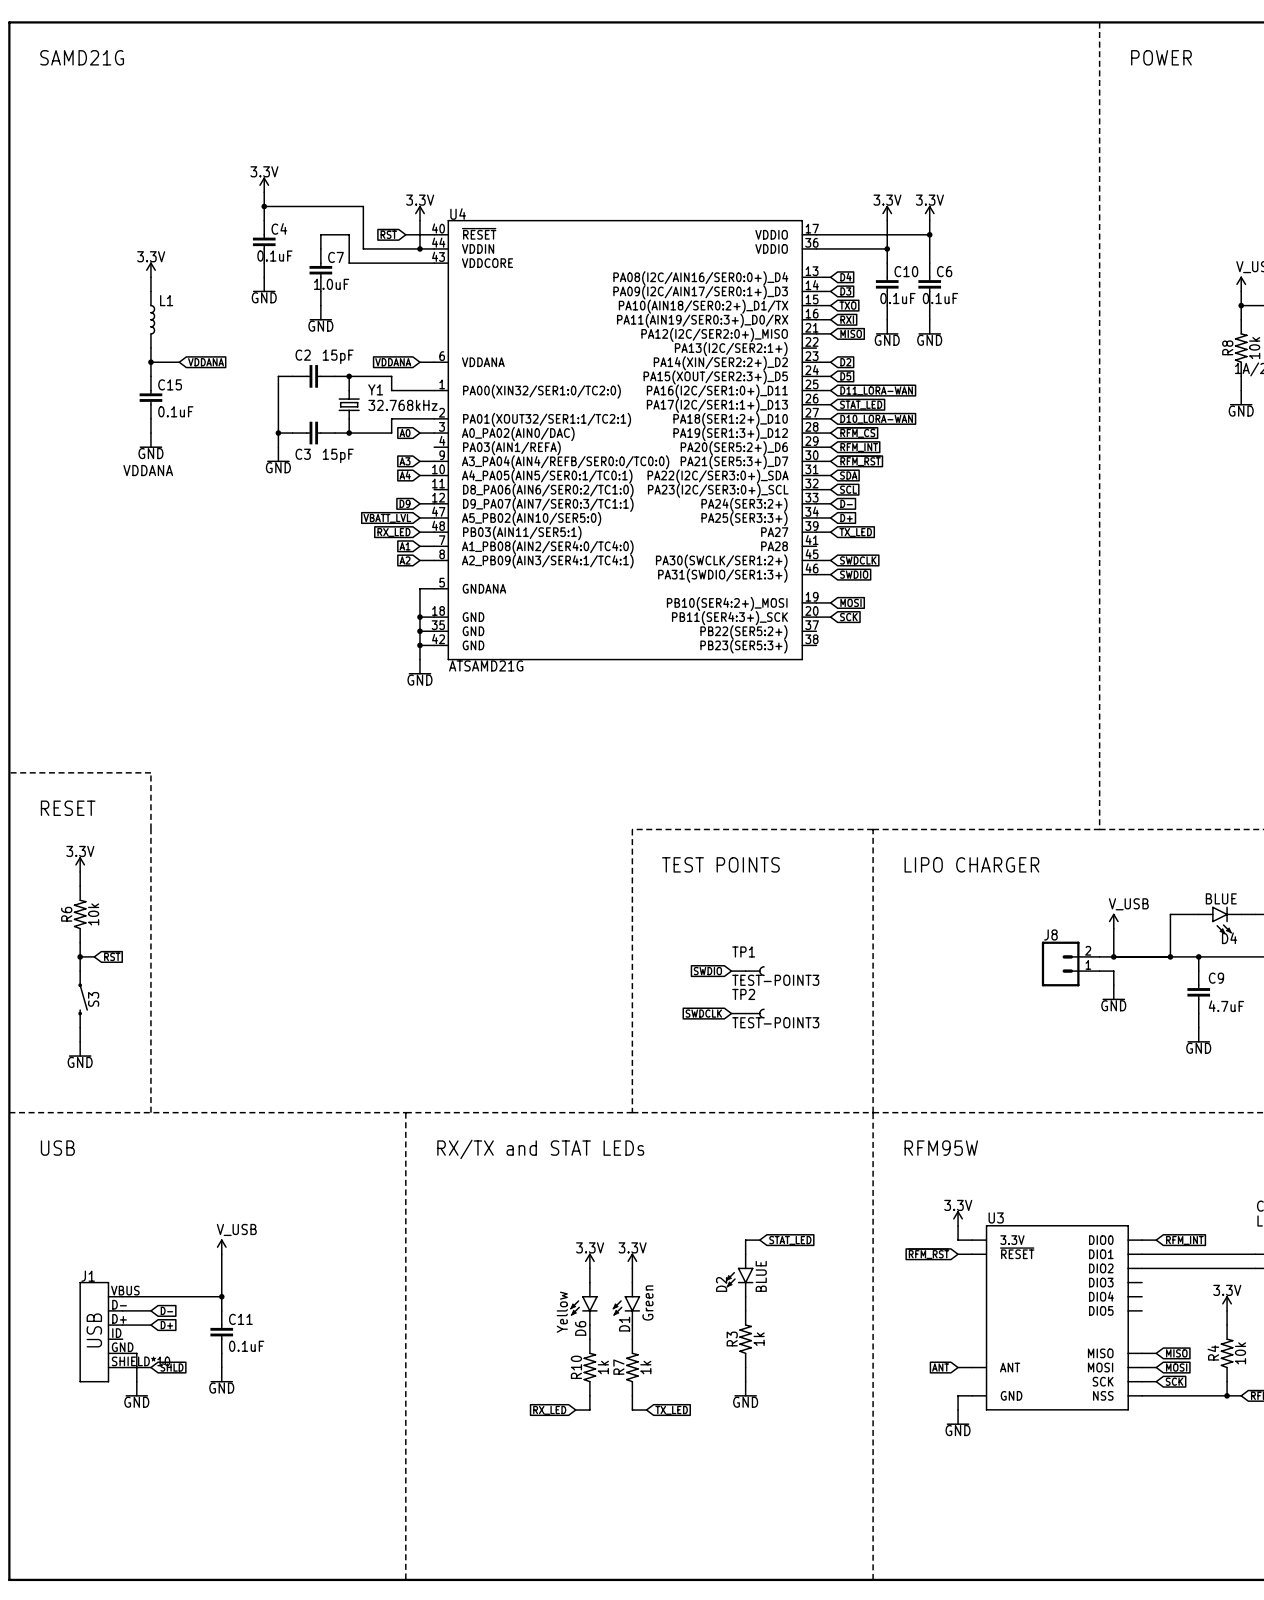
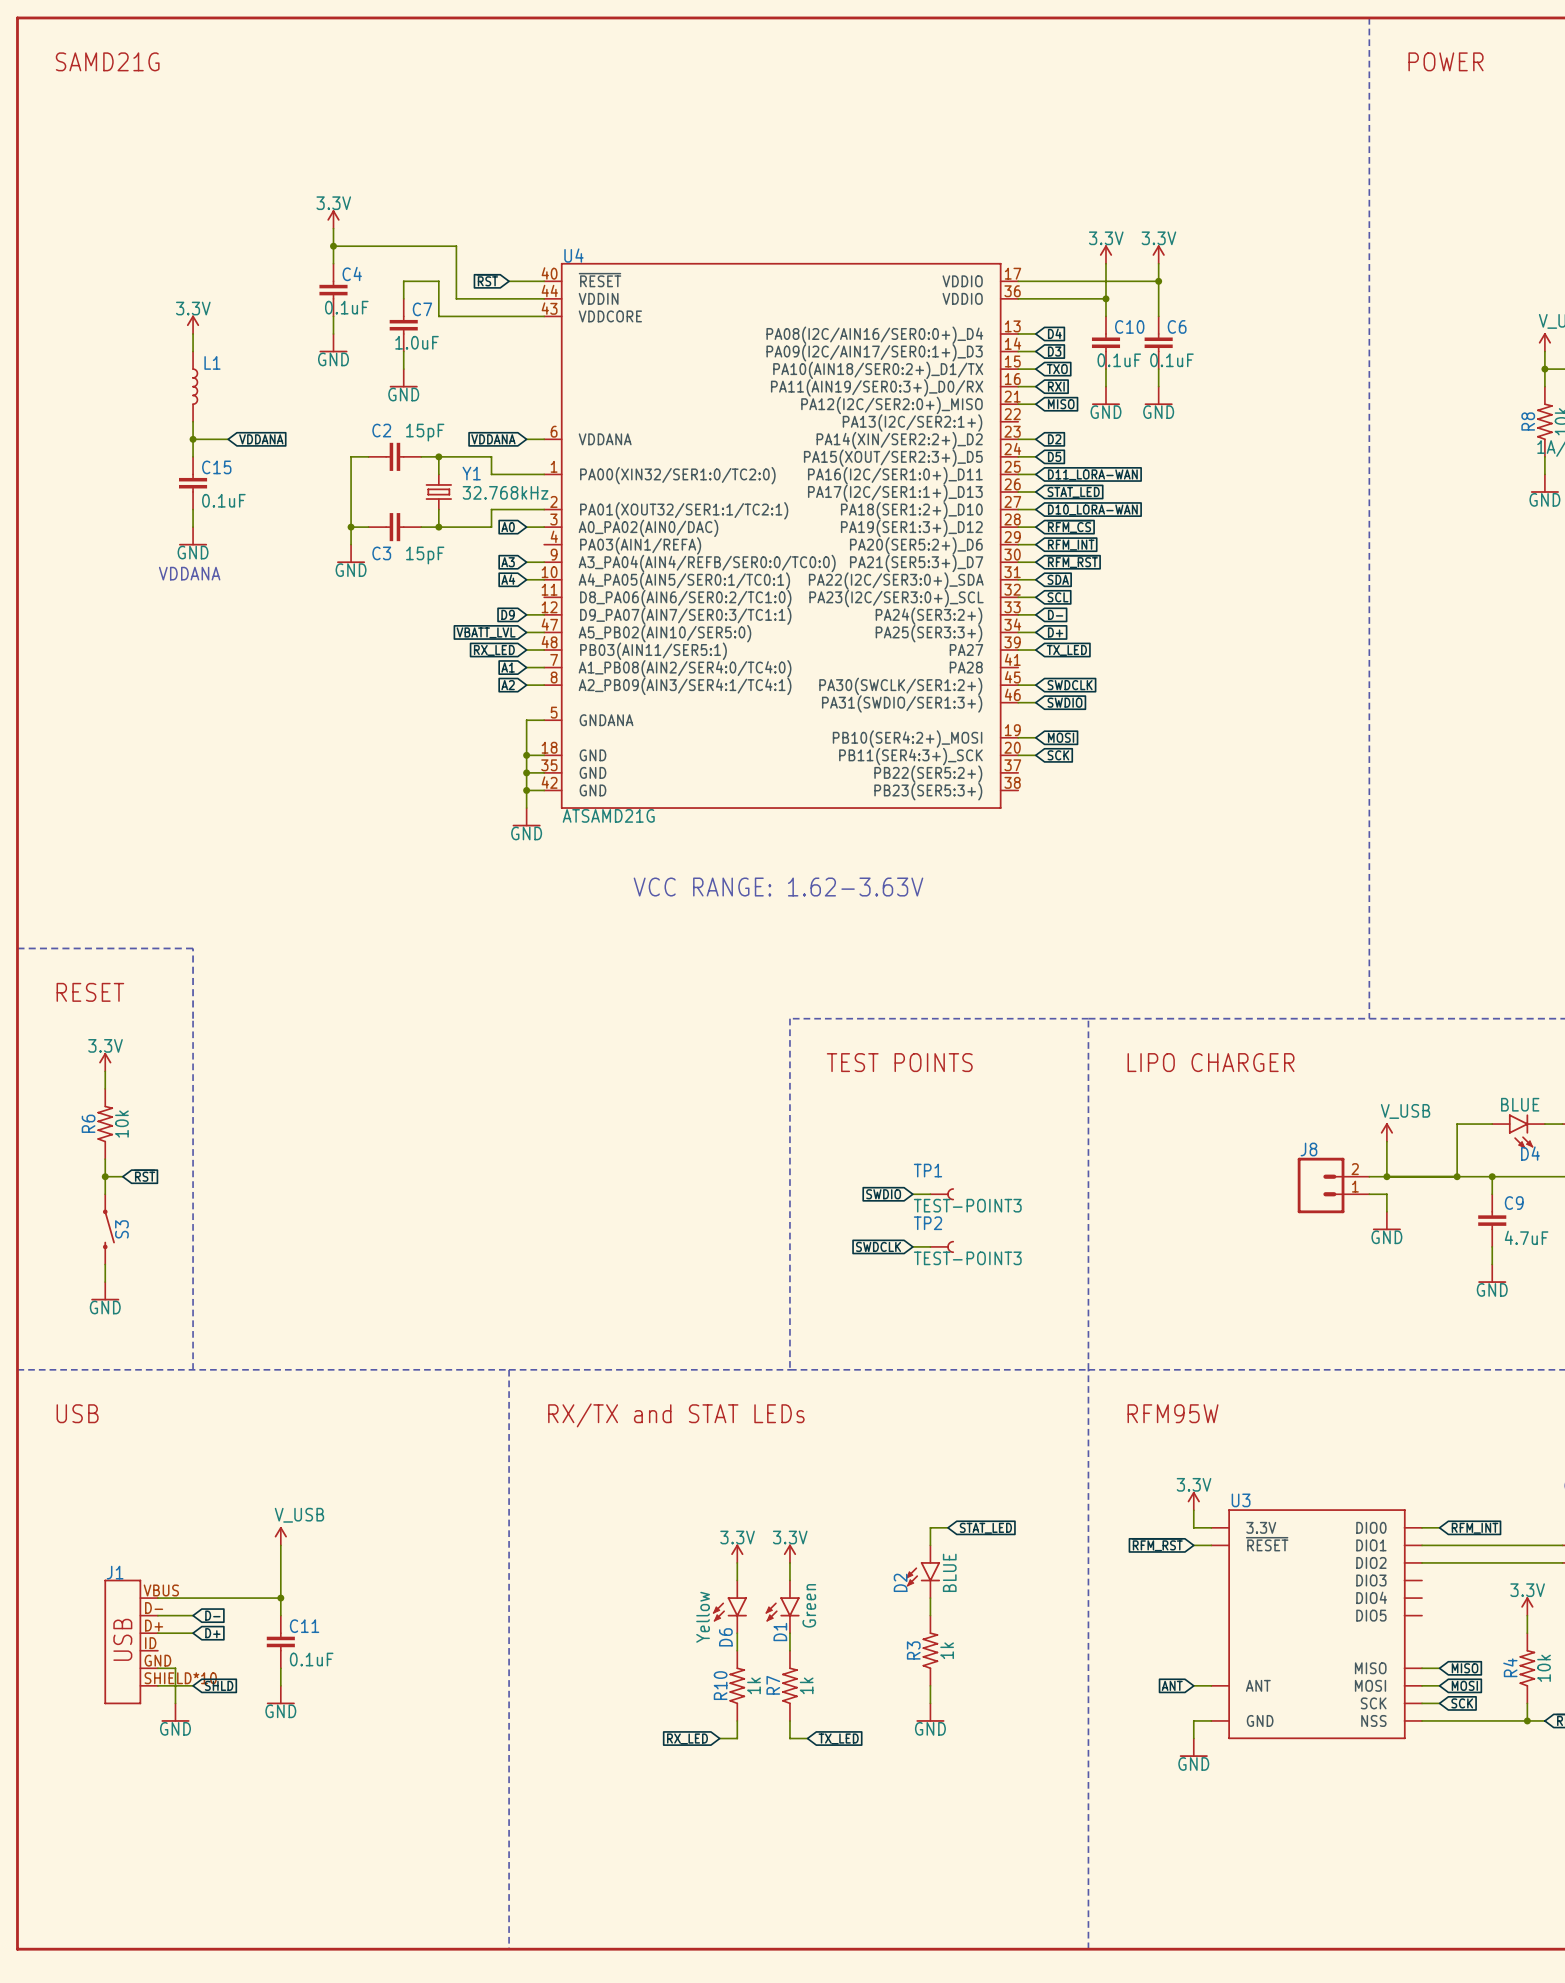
power symbol: 3.3V (419, 213) -> none
wire: (419, 220) (419, 248) -> none
junction: (419, 248) -> none
text: none -> VCC RANGE: 1.62-3.63V (778, 887)

